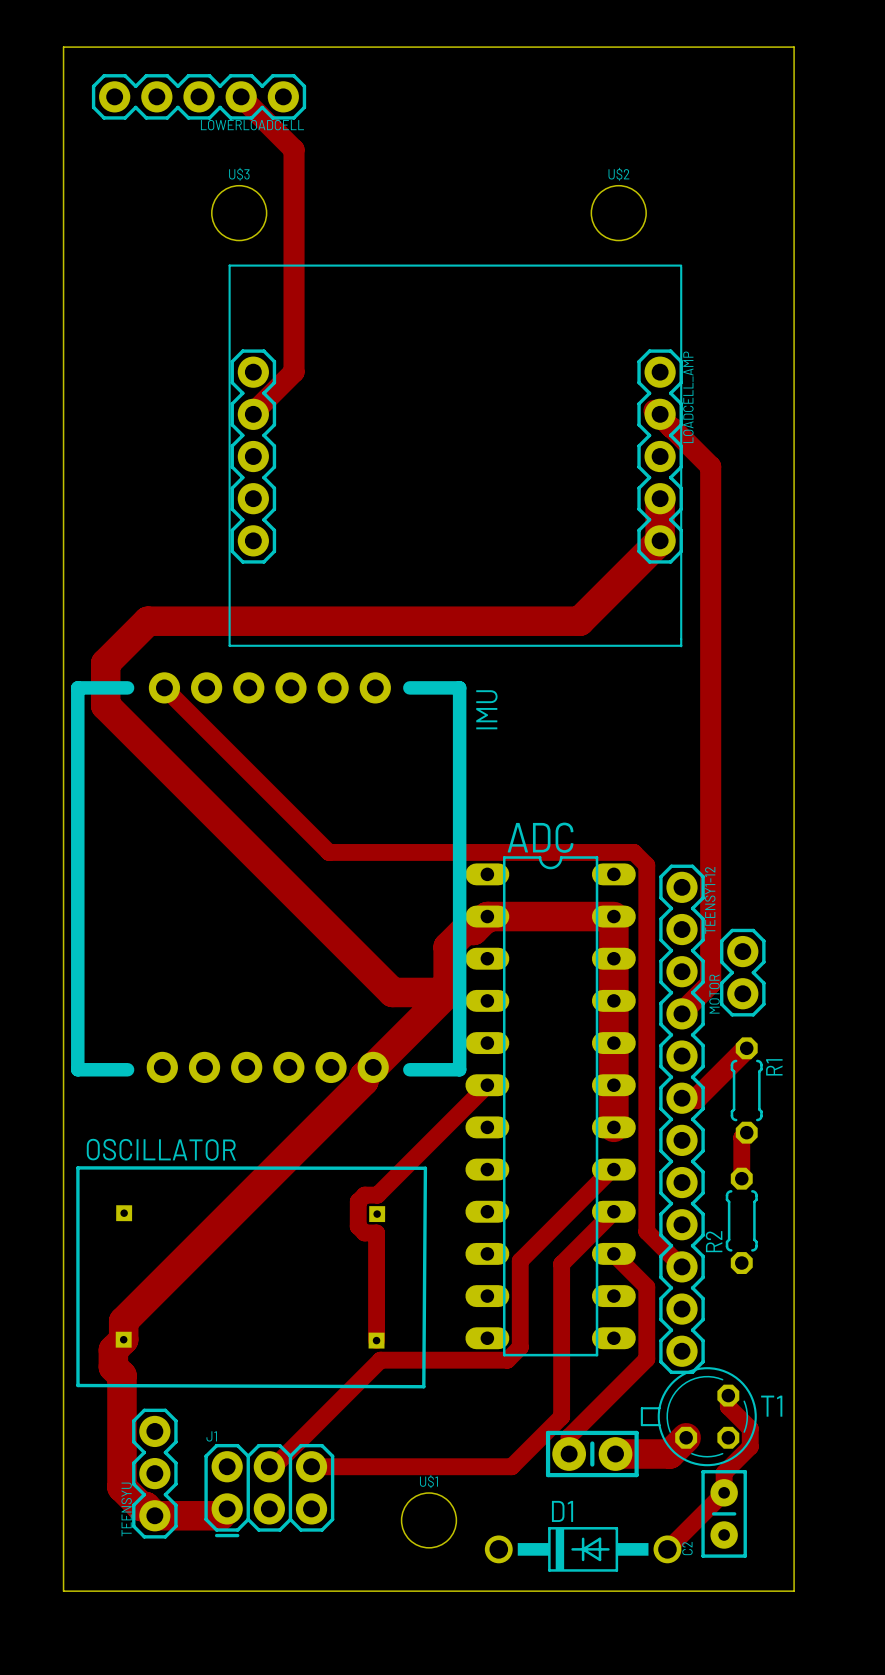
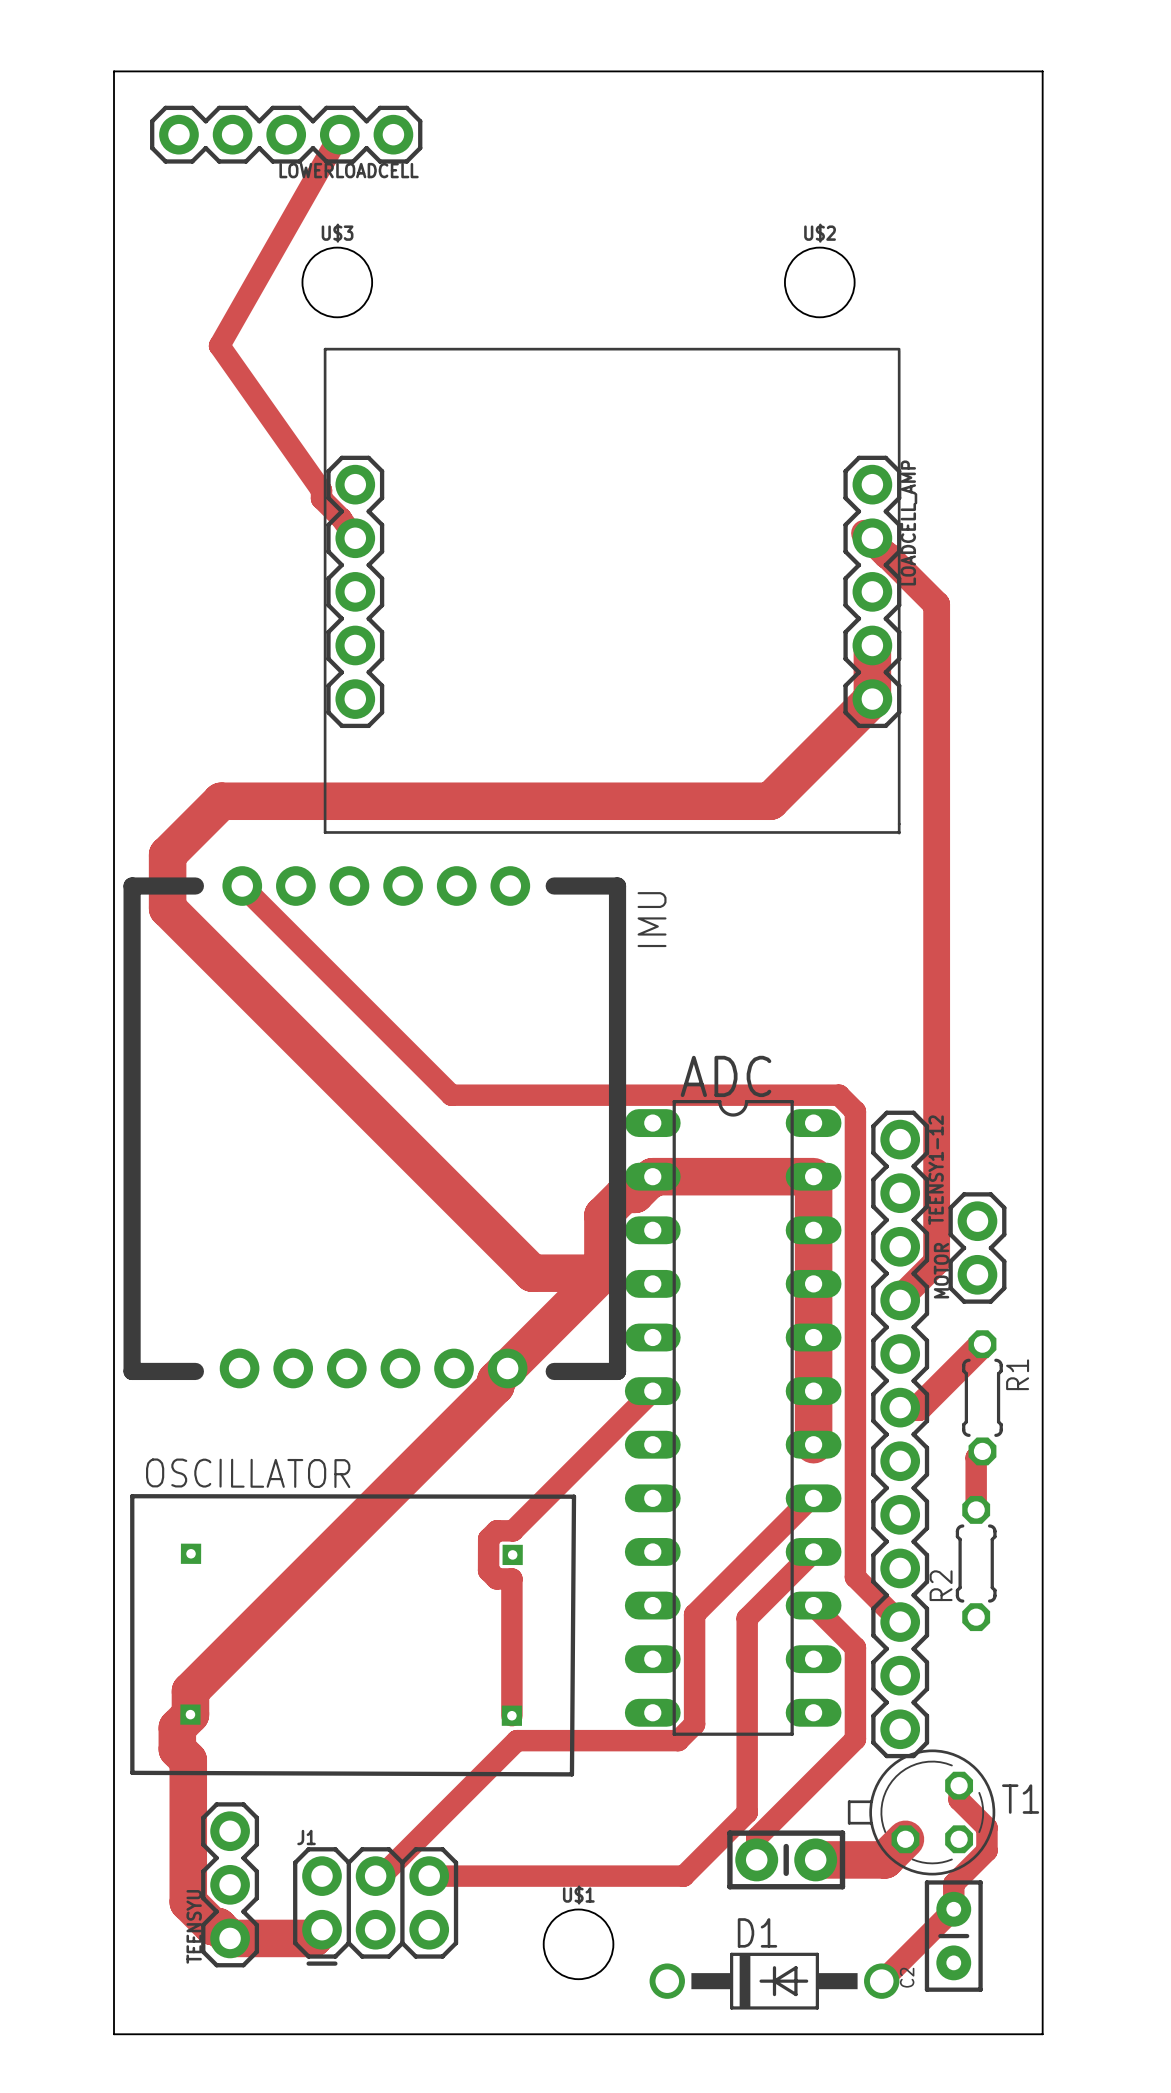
track: (241, 96) (294, 149) (294, 372) (253, 414) -> (339, 134) (219, 345) (321, 490) (321, 498) (341, 518) (355, 538)

